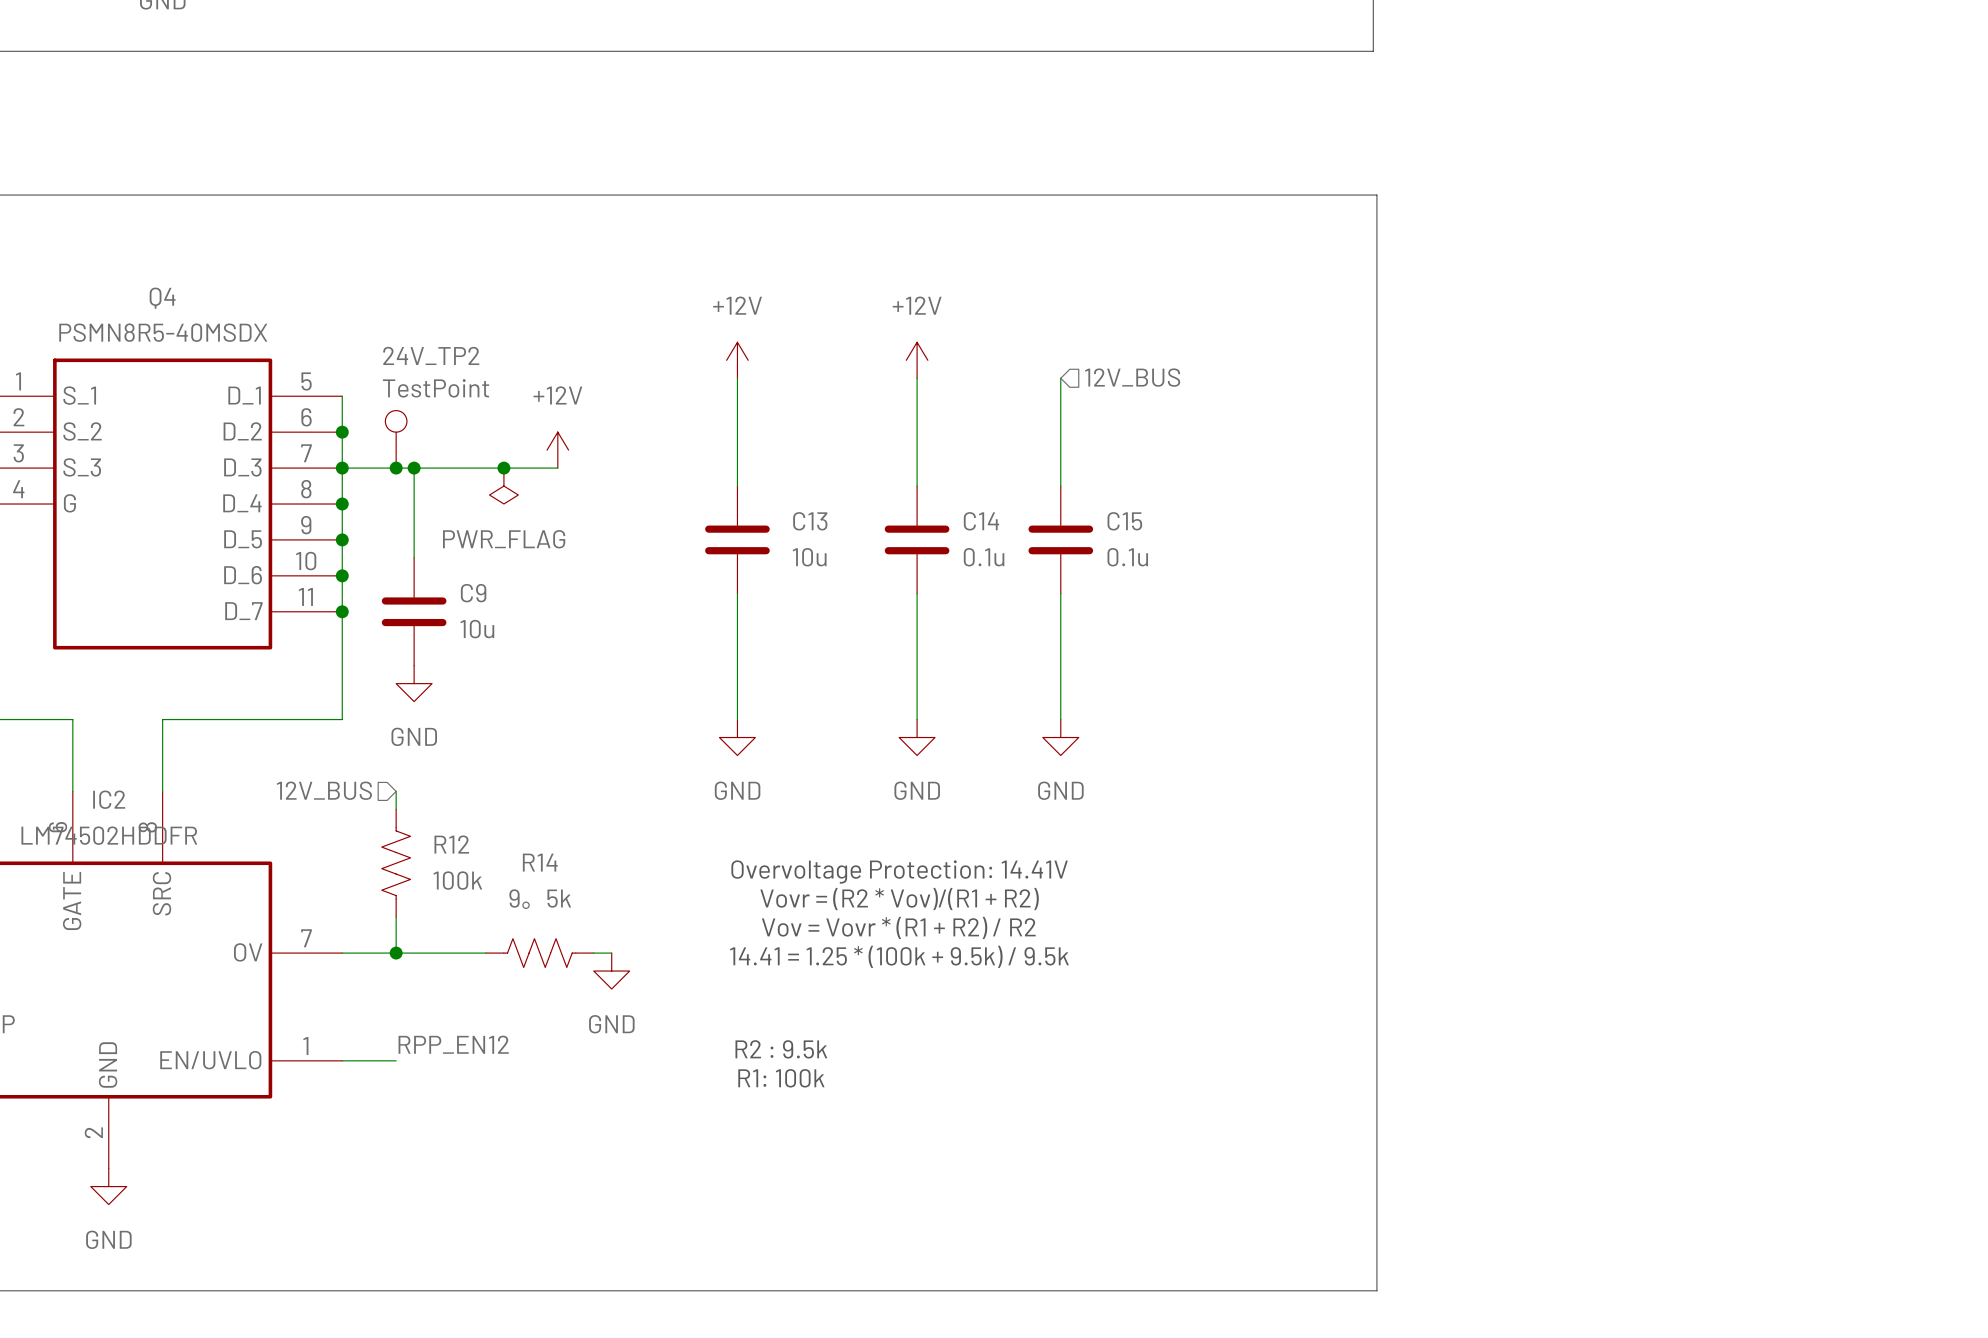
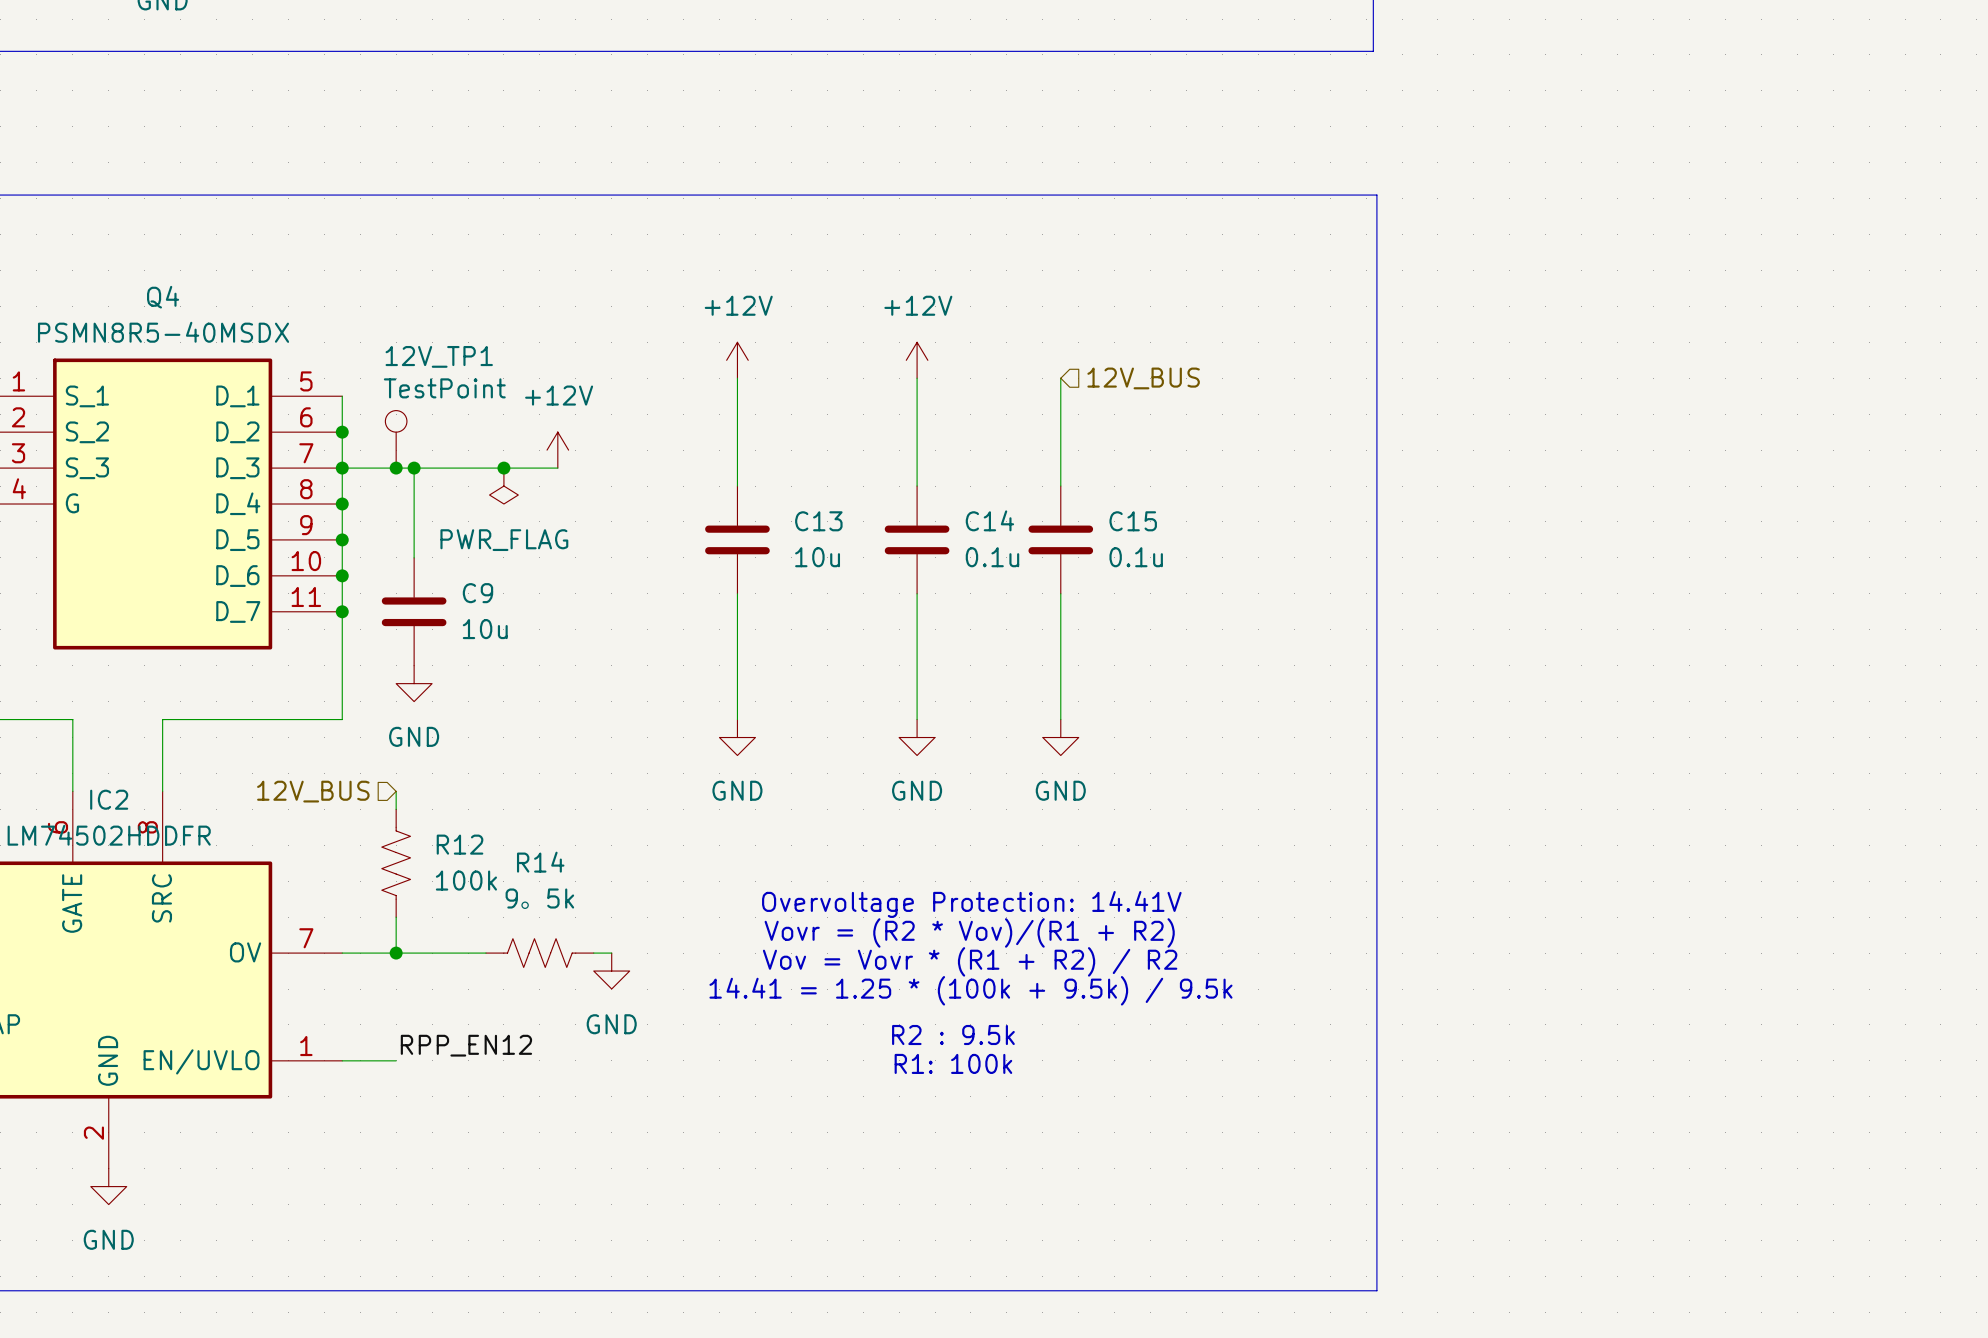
24V_TP2 name: 24V_TP2 (431, 355) -> 12V_TP1 (439, 356)
text position: Overvoltage Protection: 14.41V (899, 871) -> Overvoltage Protection: 14.41V (971, 904)
text position: Vovr = (R2 * Vov)/(R1 + R2) (899, 899) -> Vovr = (R2 * Vov)/(R1 + R2) (969, 932)
text position: Vov = Vovr * (R1 + R2) / R2 (898, 927) -> Vov = Vovr * (R1 + R2) / R2 (970, 961)
text position: 14.41 = 1.25 * (100k + 9.5k) / 9.5k (899, 956) -> 14.41 = 1.25 * (100k + 9.5k) / 9.5k (970, 990)
text position: R2 : 9.5k (781, 1049) -> R2 : 9.5k (953, 1035)
text position: R1: 100k (781, 1078) -> R1: 100k (953, 1063)

